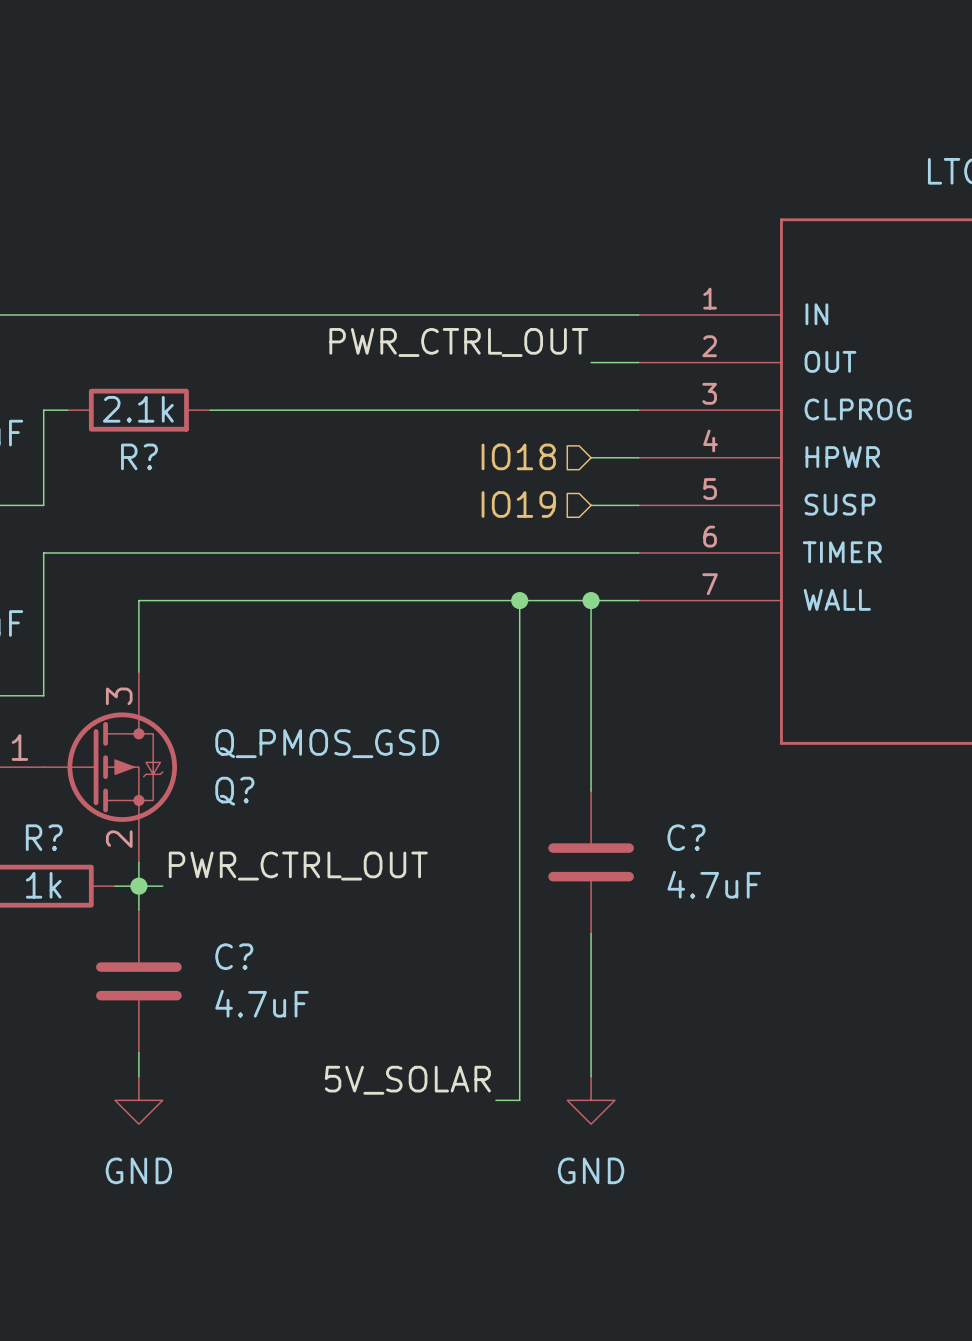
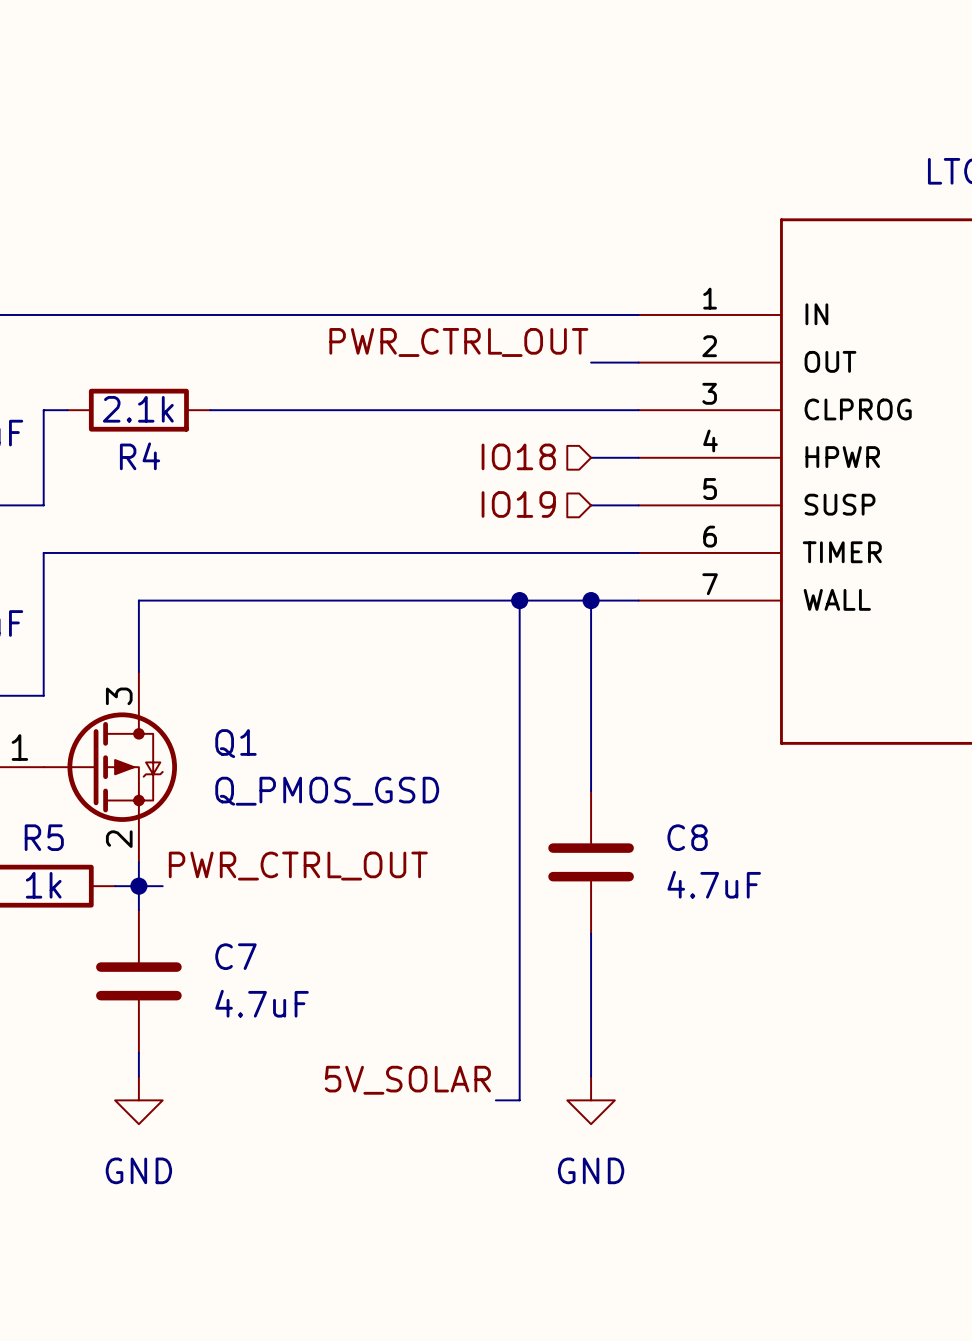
R? name: R? (139, 456) -> R4 (140, 456)
Q? value position: Q_PMOS_GSD (327, 743) -> Q_PMOS_GSD (327, 791)
Q? name: Q? (234, 791) -> Q1 (235, 743)
R? name: R? (44, 837) -> R5 (44, 837)
C? name: C? (686, 837) -> C8 (687, 837)
C? name: C? (234, 956) -> C7 (235, 956)

